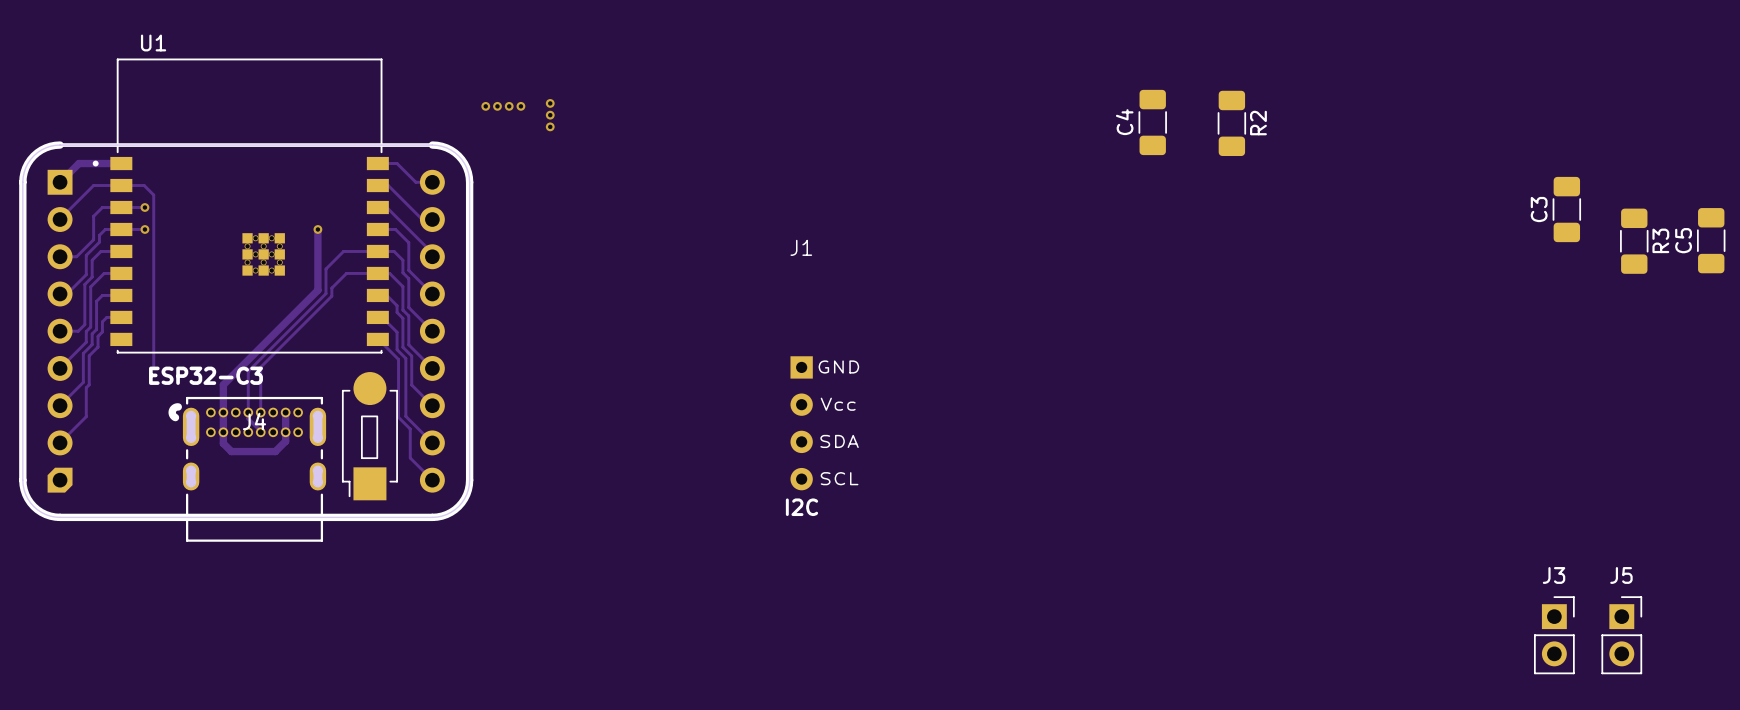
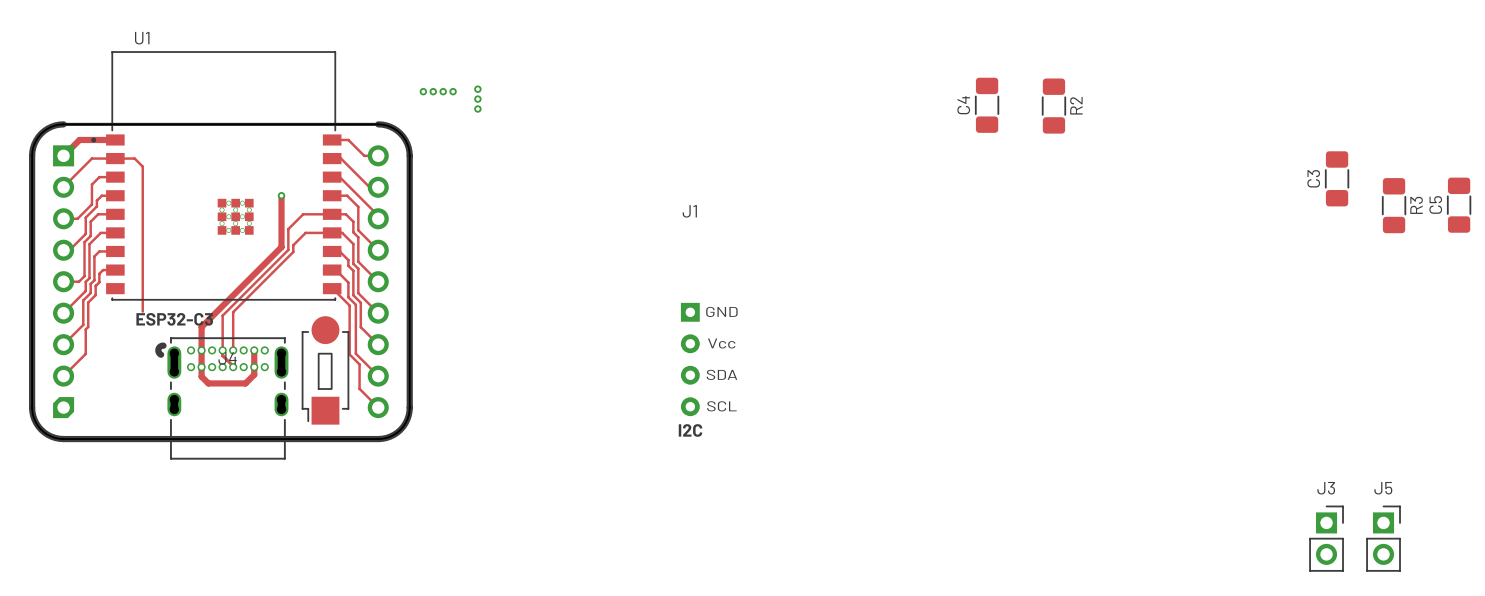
track: (127, 207) (144, 207) -> none
via: (144, 207) -> none
track: (127, 229) (144, 229) -> none
via: (144, 229) -> none

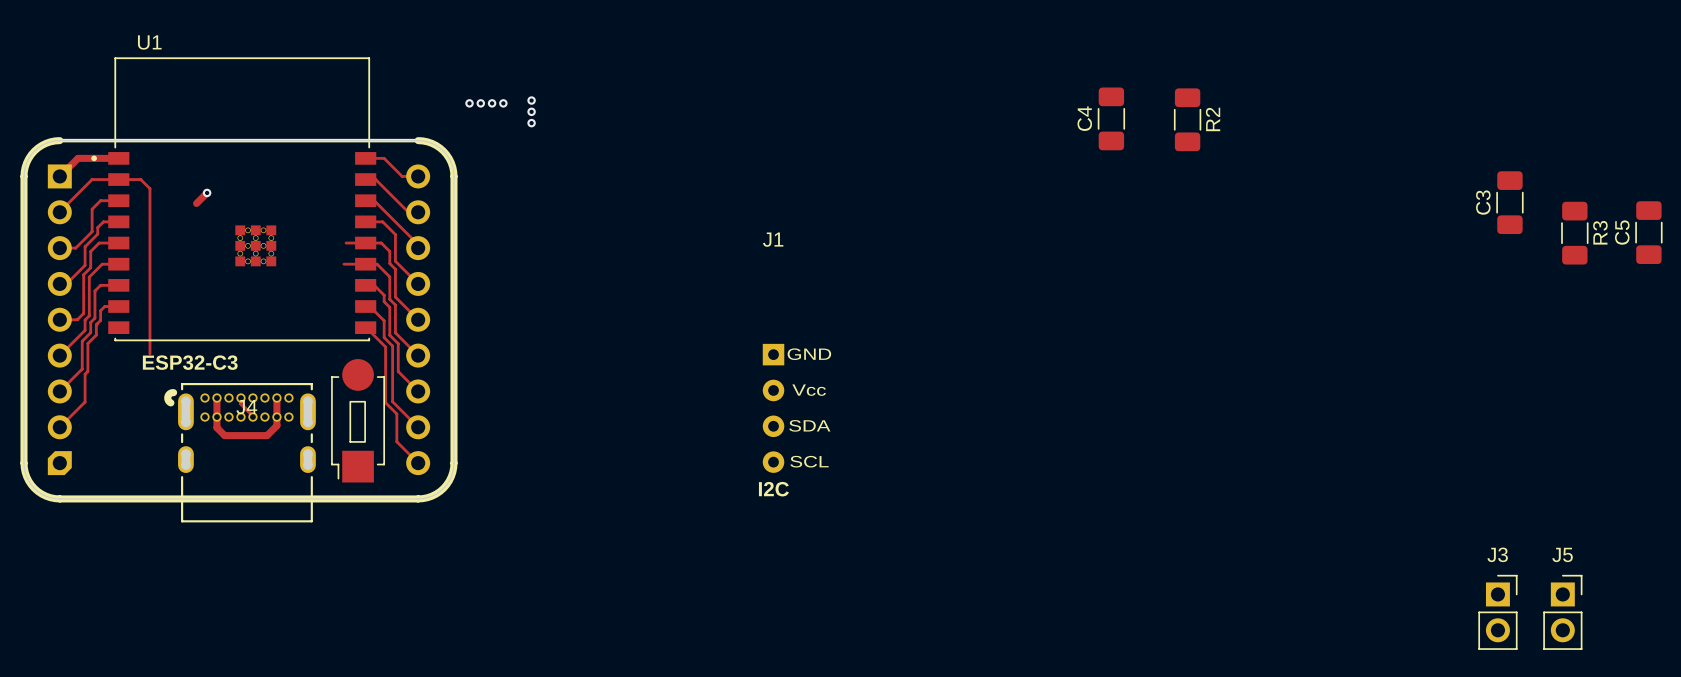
track: none -> (207, 192) (196, 203)
via: none -> (207, 192)
track: (281, 195) (281, 247) (201, 327) (201, 350) -> none
via: (281, 195) -> none
track: (314, 214) (303, 214) (288, 229) (288, 249) (222, 315) (222, 350) -> none
track: (313, 232) (305, 232) (293, 245) (293, 252) (233, 312) (233, 350) -> none

